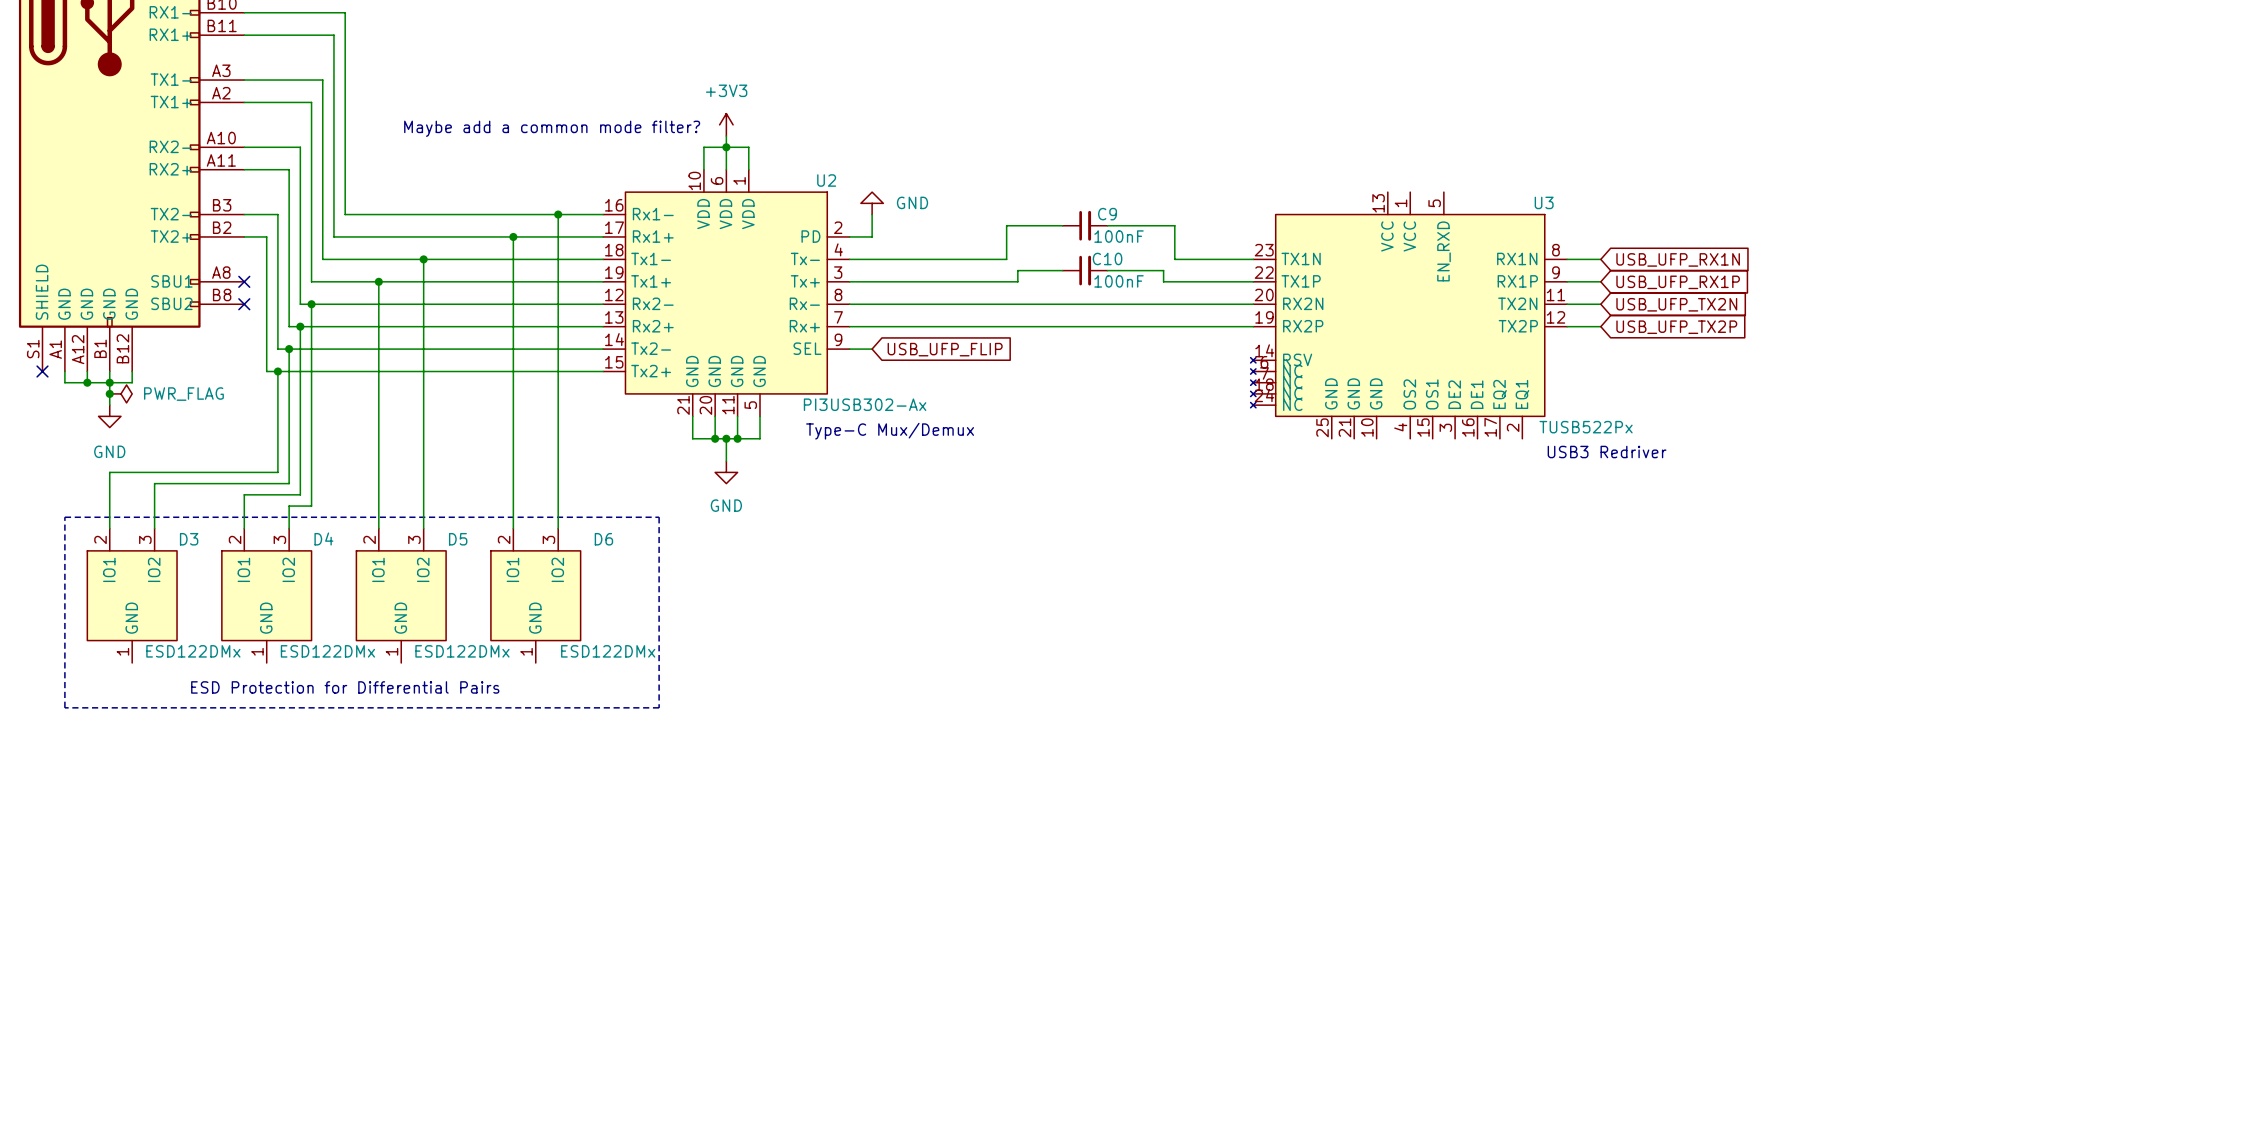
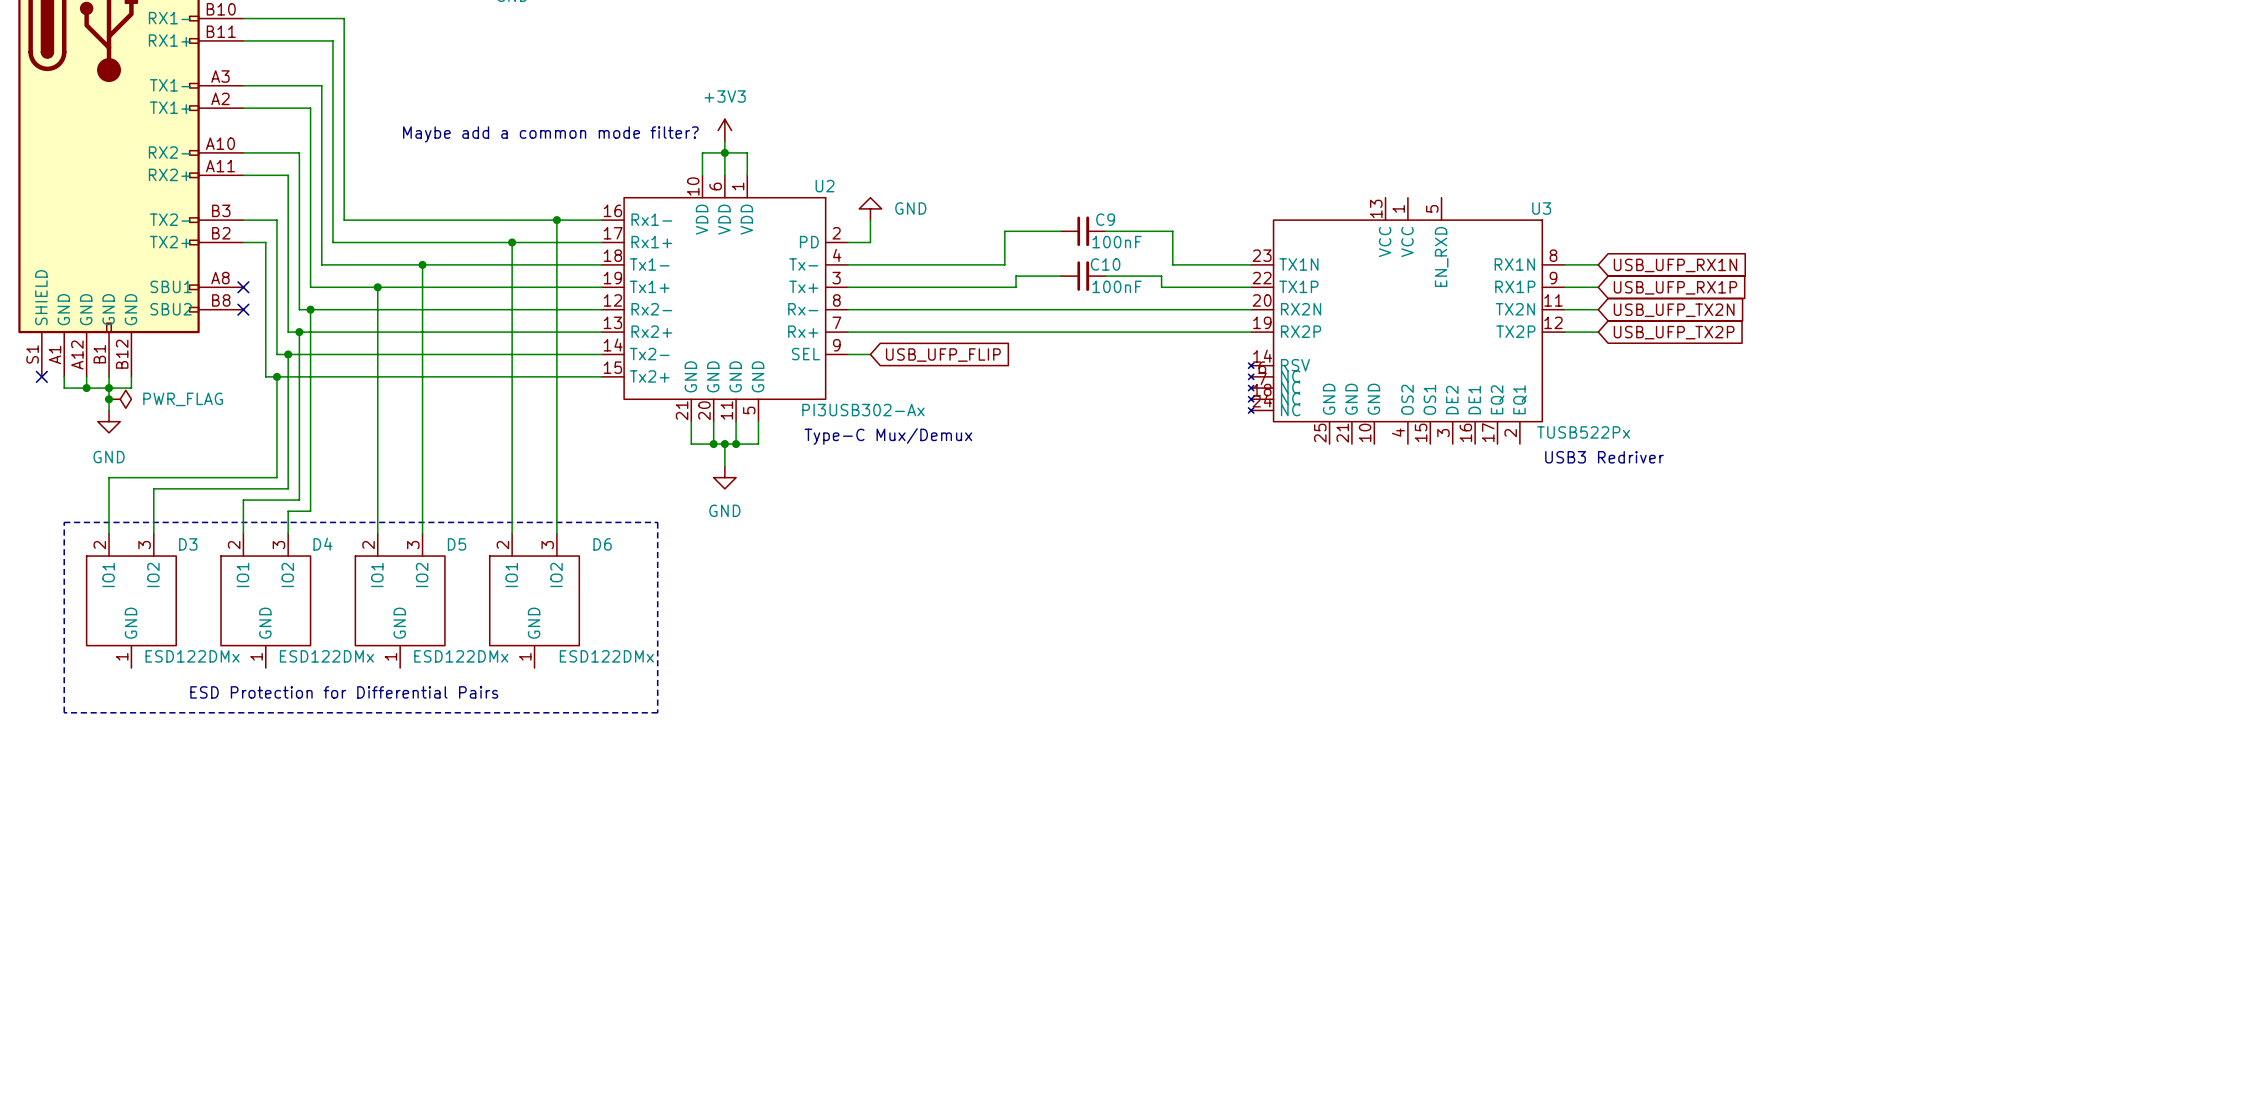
U2 symbol: [603, 169, 850, 417] -> [601, 175, 849, 422]
U3 symbol: [1250, 192, 1568, 439] -> [1248, 197, 1565, 445]
D3 symbol: [87, 528, 178, 663] -> [86, 533, 177, 669]
D4 symbol: [221, 528, 312, 663] -> [220, 533, 311, 669]
D5 symbol: [356, 528, 447, 663] -> [355, 533, 445, 669]
D6 symbol: [490, 528, 581, 663] -> [489, 533, 580, 669]

